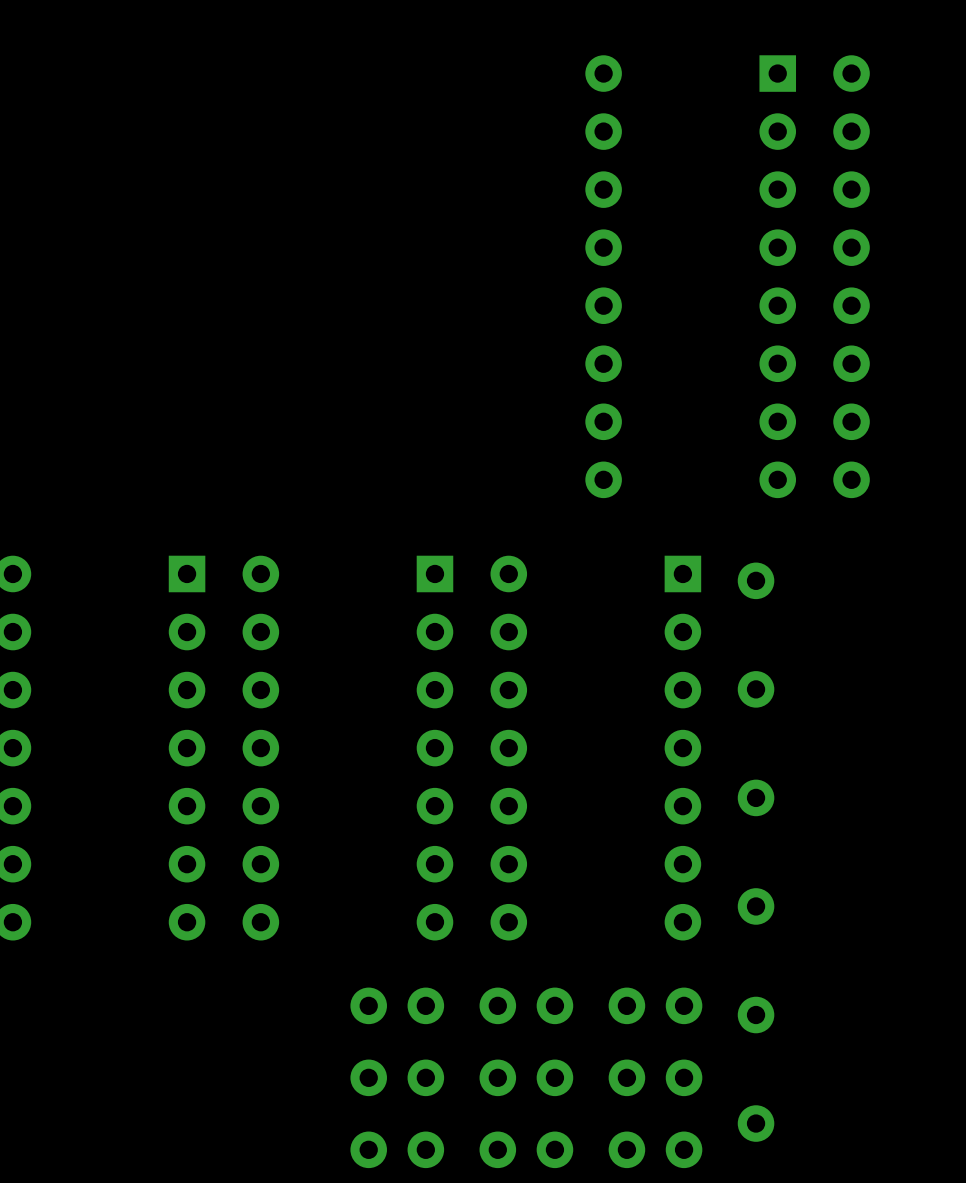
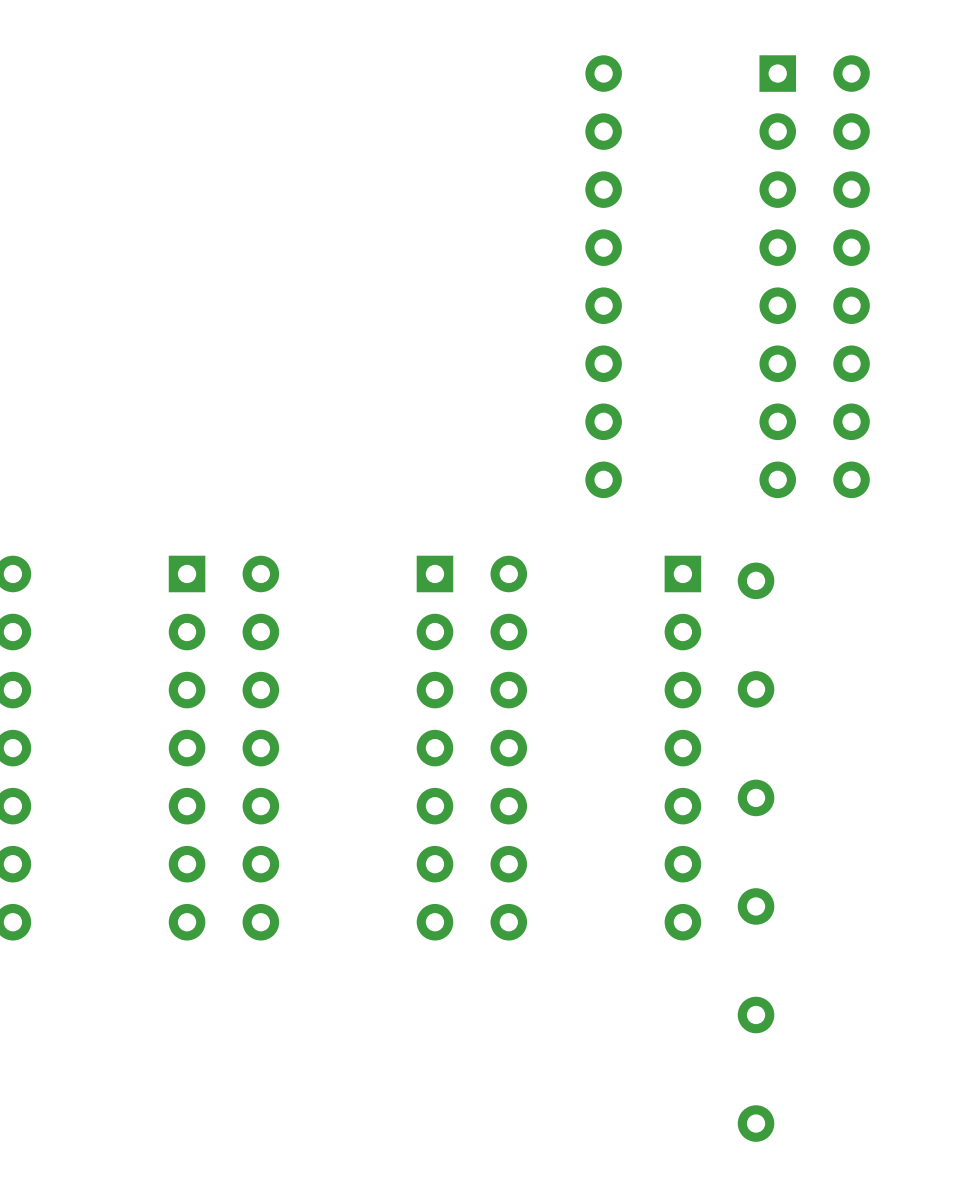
part: (397, 1005) -> none
part: (526, 1005) -> none
part: (655, 1005) -> none
part: (397, 1077) -> none
part: (526, 1077) -> none
part: (655, 1077) -> none
part: (397, 1149) -> none
part: (526, 1149) -> none
part: (655, 1149) -> none

